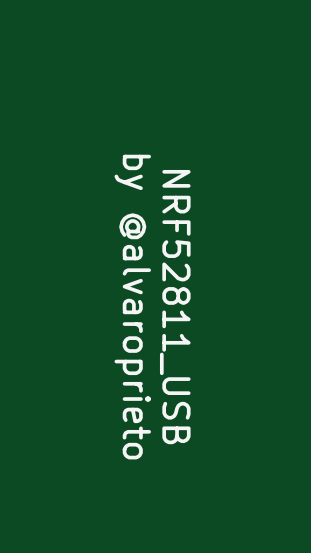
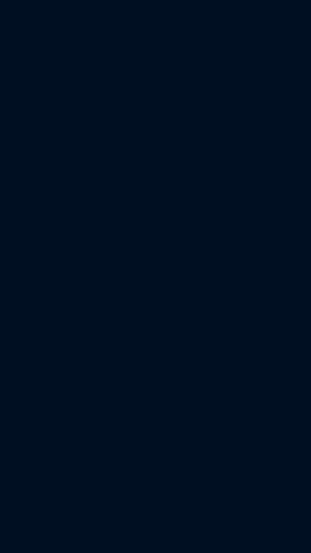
text: by @alvaroprieto (132, 307) -> none
text: NRF52811_USB (175, 307) -> none

